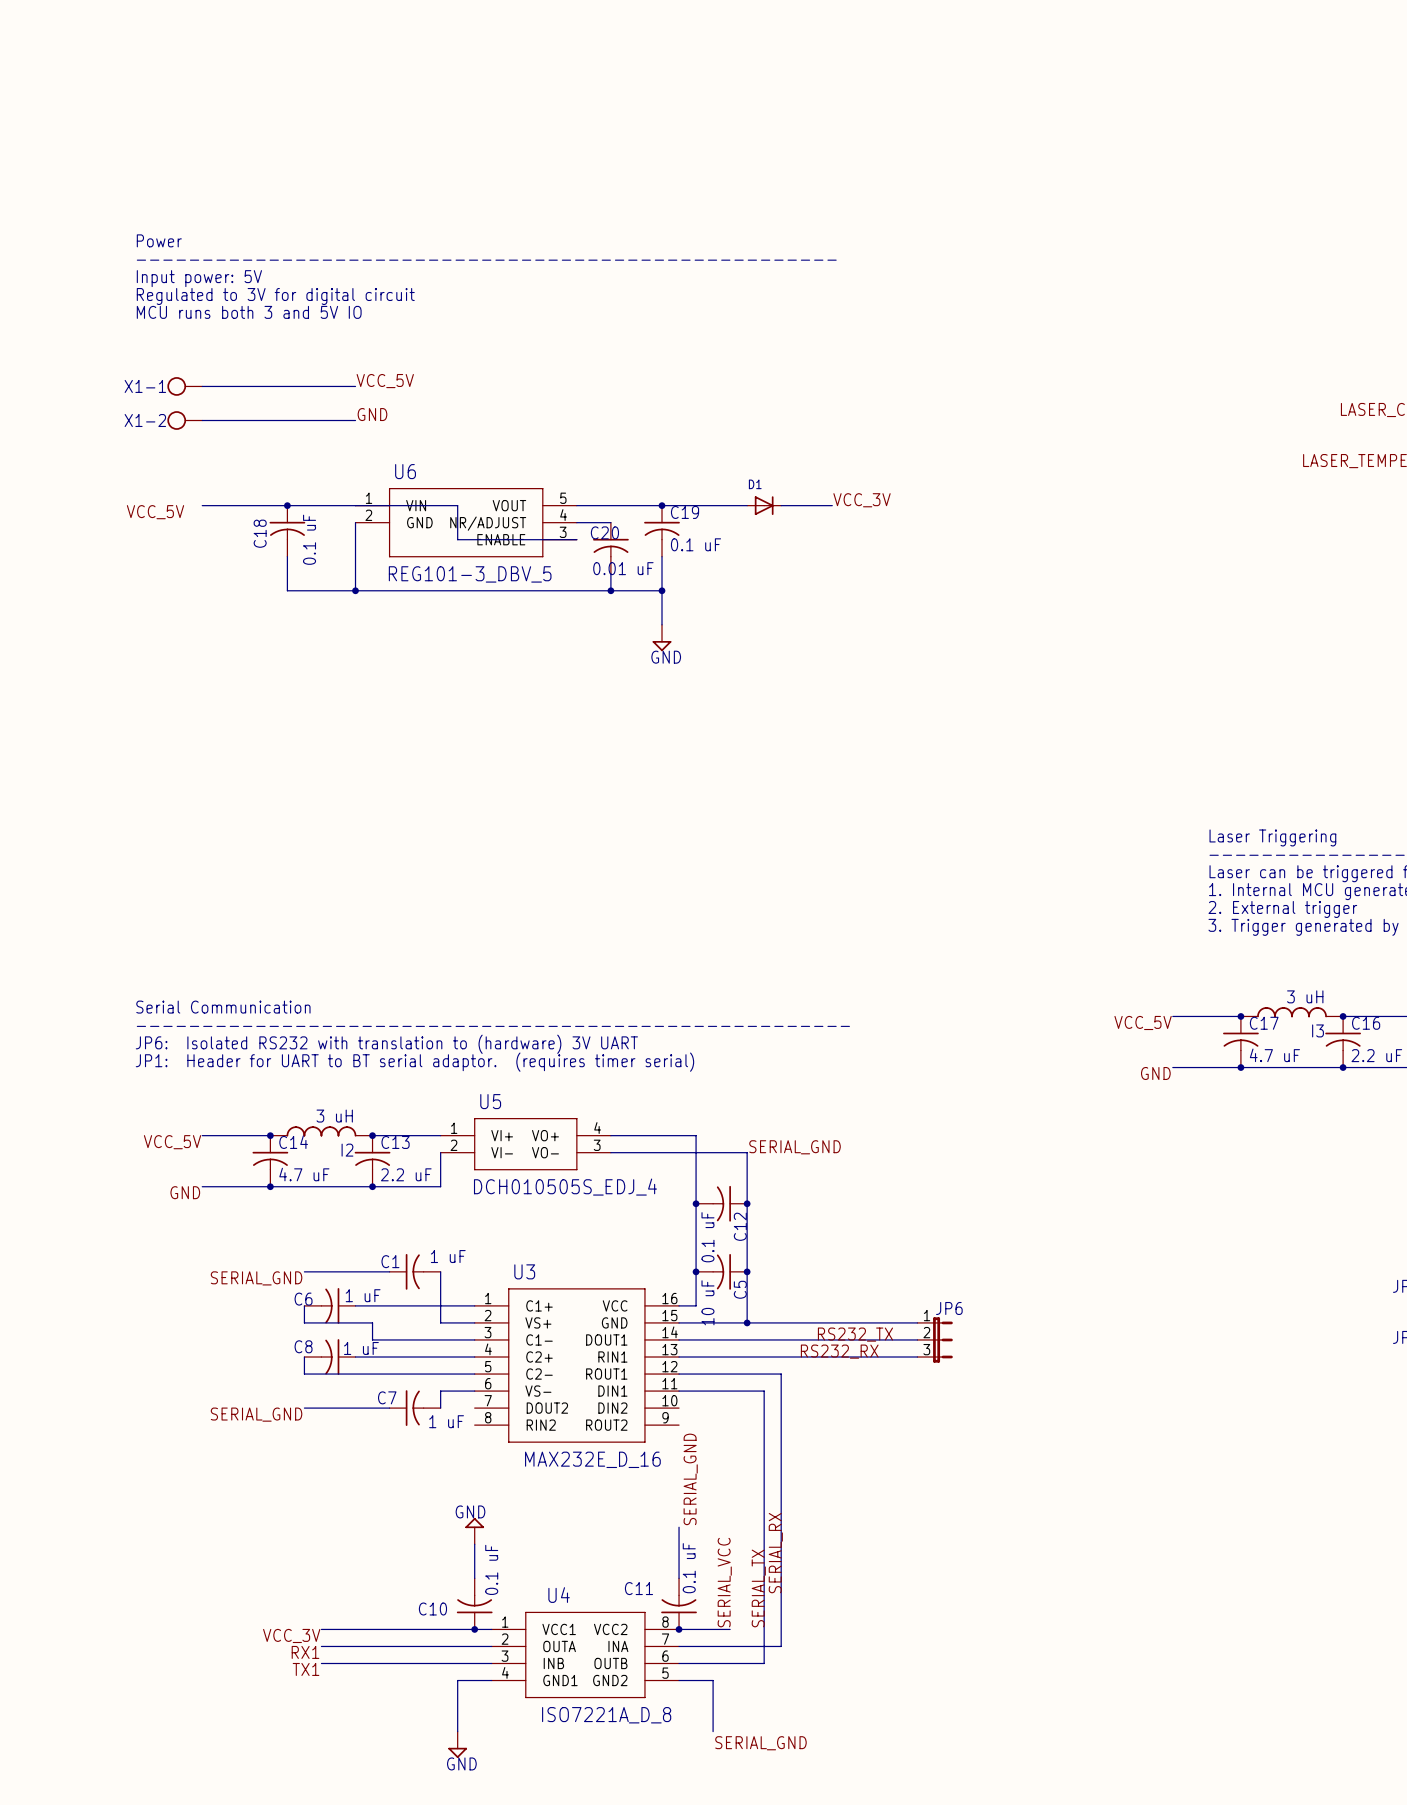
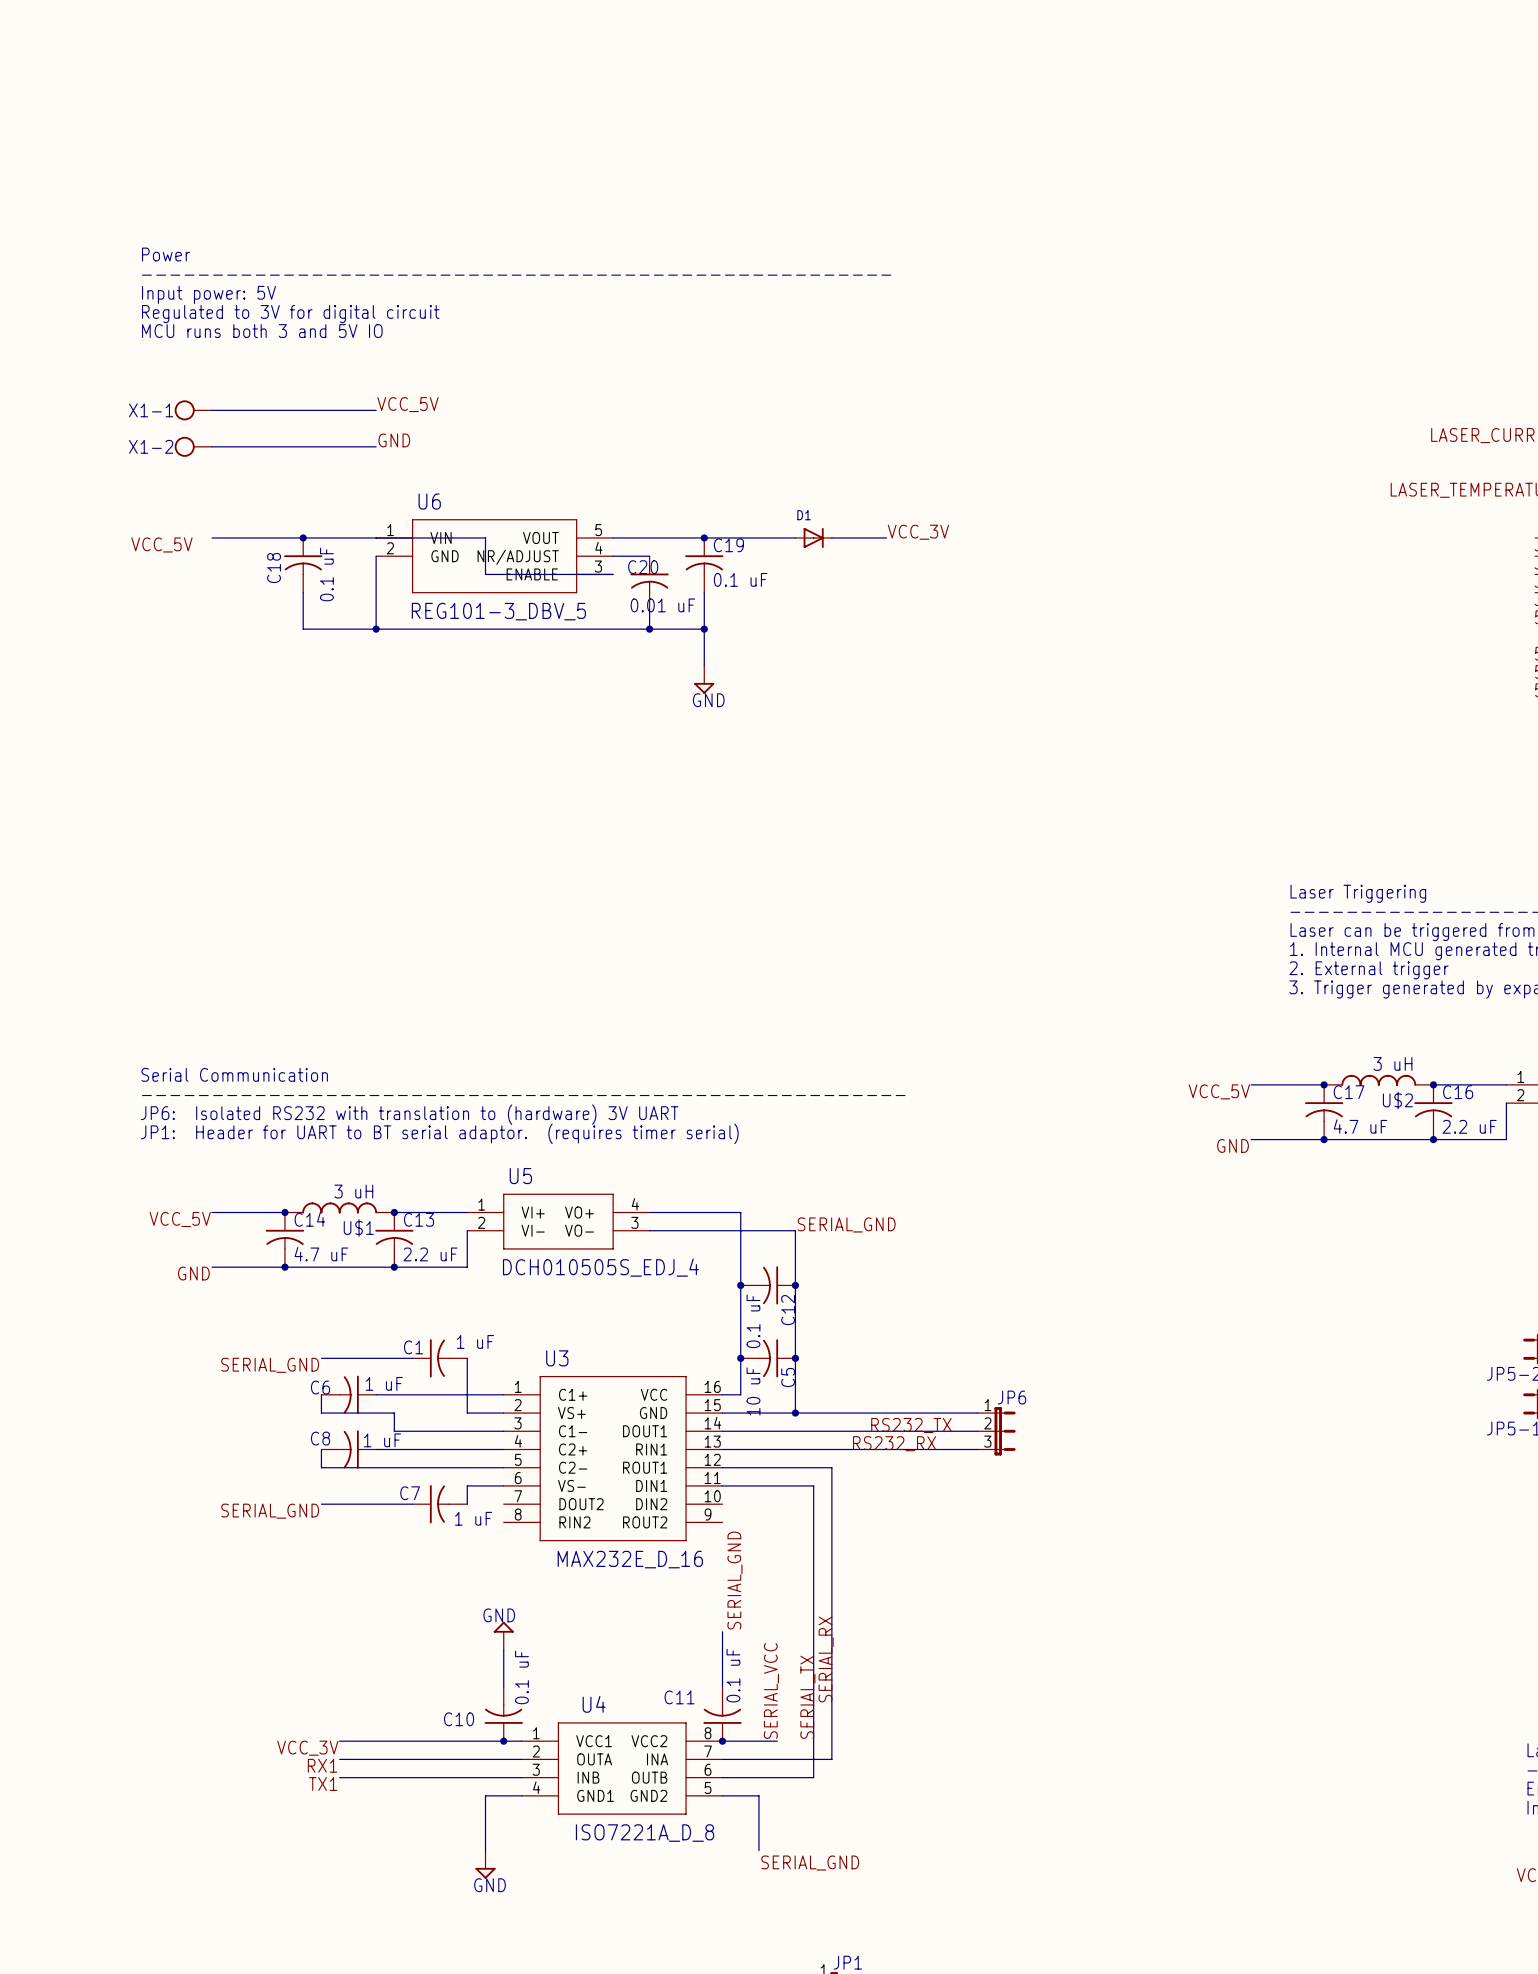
I3 name: I3 (1318, 1030) -> U$2 (1397, 1100)
I2 name: I2 (347, 1150) -> U$1 (358, 1228)

